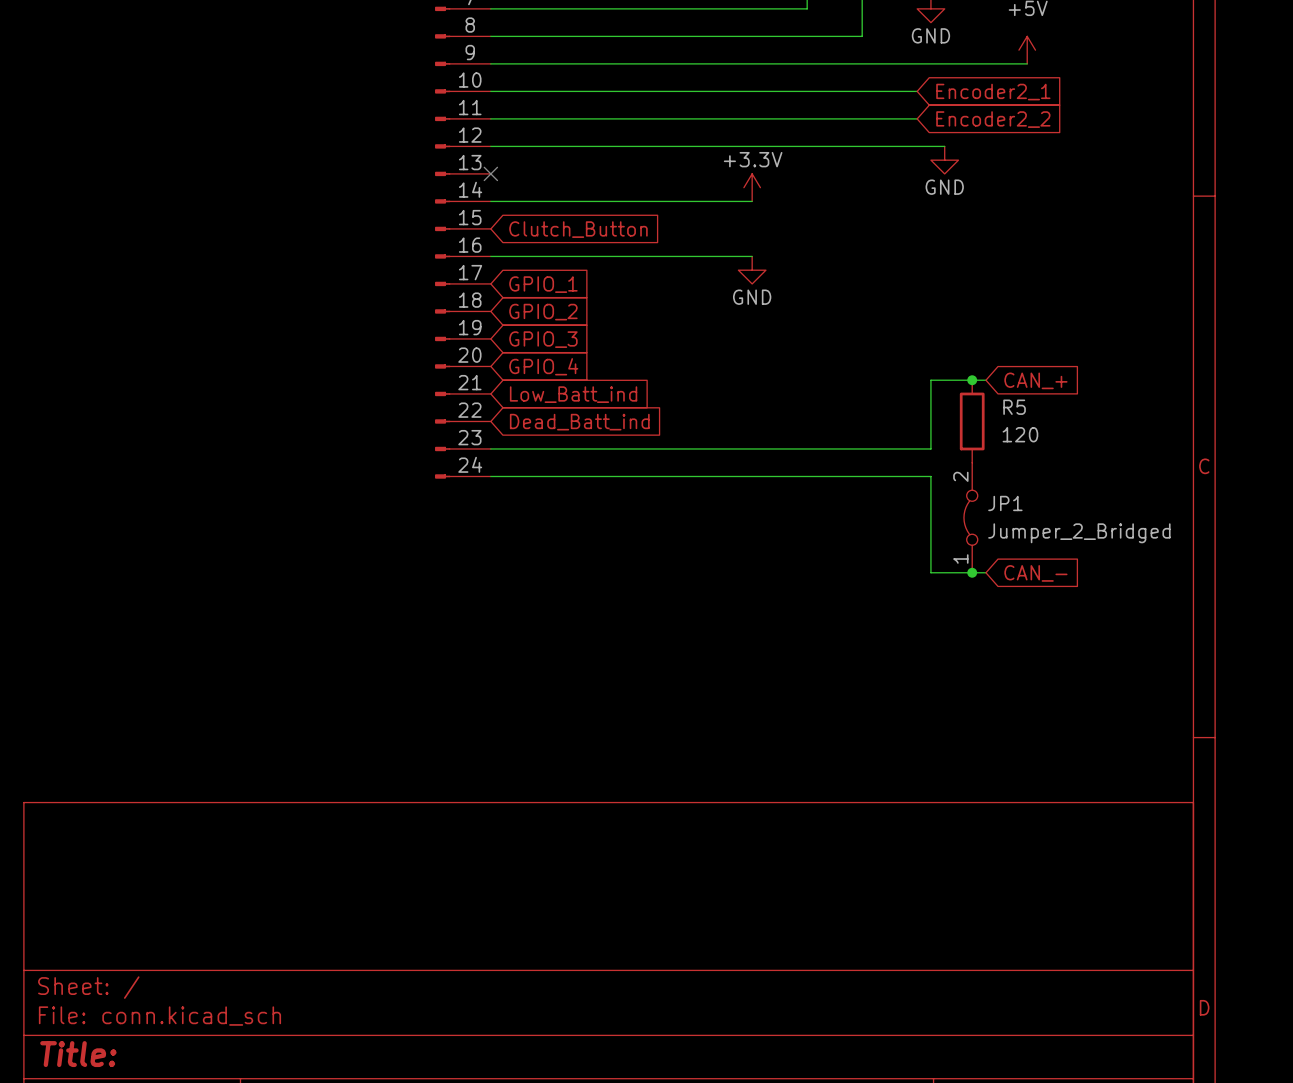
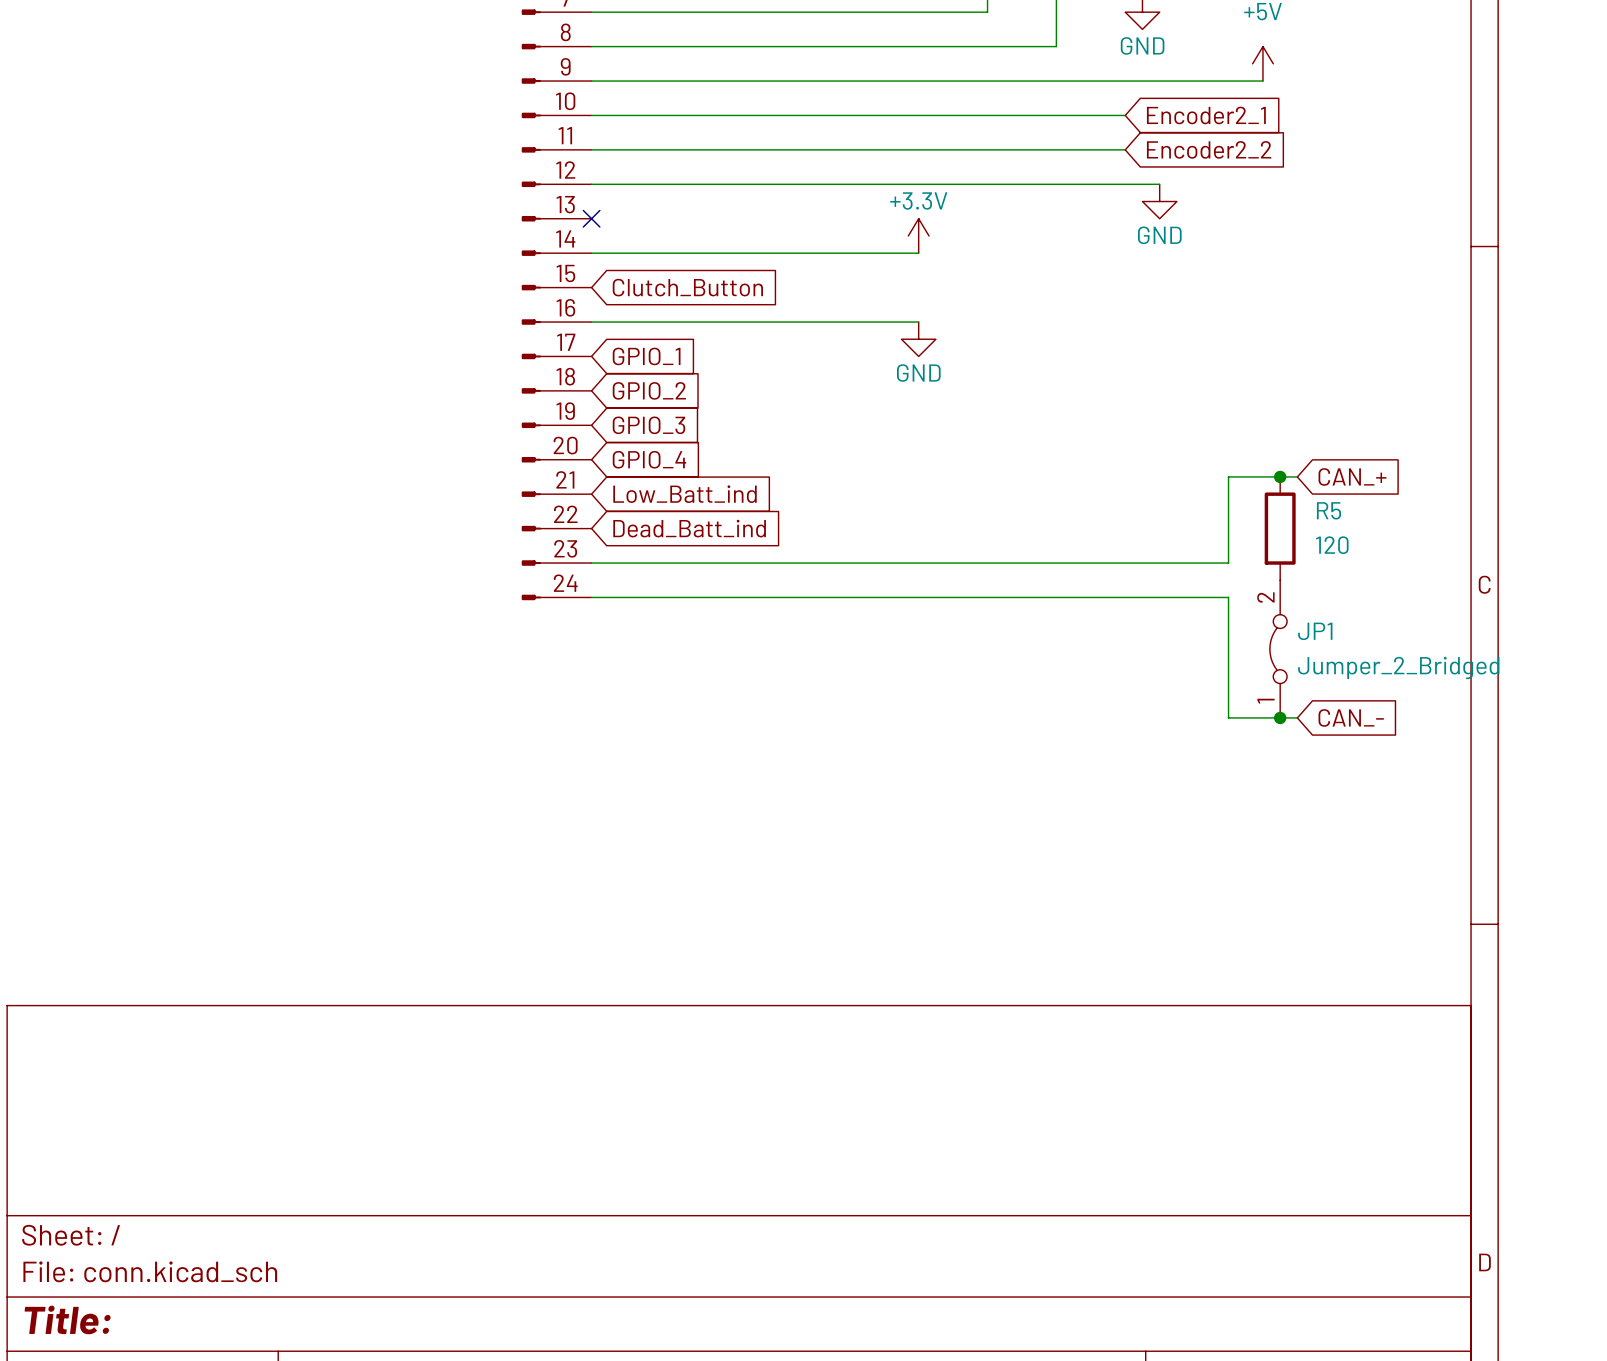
junction: (972, 380) -> none
wire: (985, 380) (930, 380) (930, 448) -> (1297, 476) (1228, 476) (1228, 563) (1142, 563)
global label position: CAN_+ (1035, 380) -> CAN_+ (1352, 476)
junction: none -> (1280, 476)
R5 position: (972, 421) -> (1280, 528)
wire: (930, 476) (930, 572) (985, 572) -> (1142, 597) (1228, 597) (1228, 717) (1297, 717)
JP1 position: (970, 517) -> (1278, 649)
junction: (972, 572) -> none
junction: none -> (1280, 717)
global label position: CAN_- (1035, 573) -> CAN_- (1351, 717)

